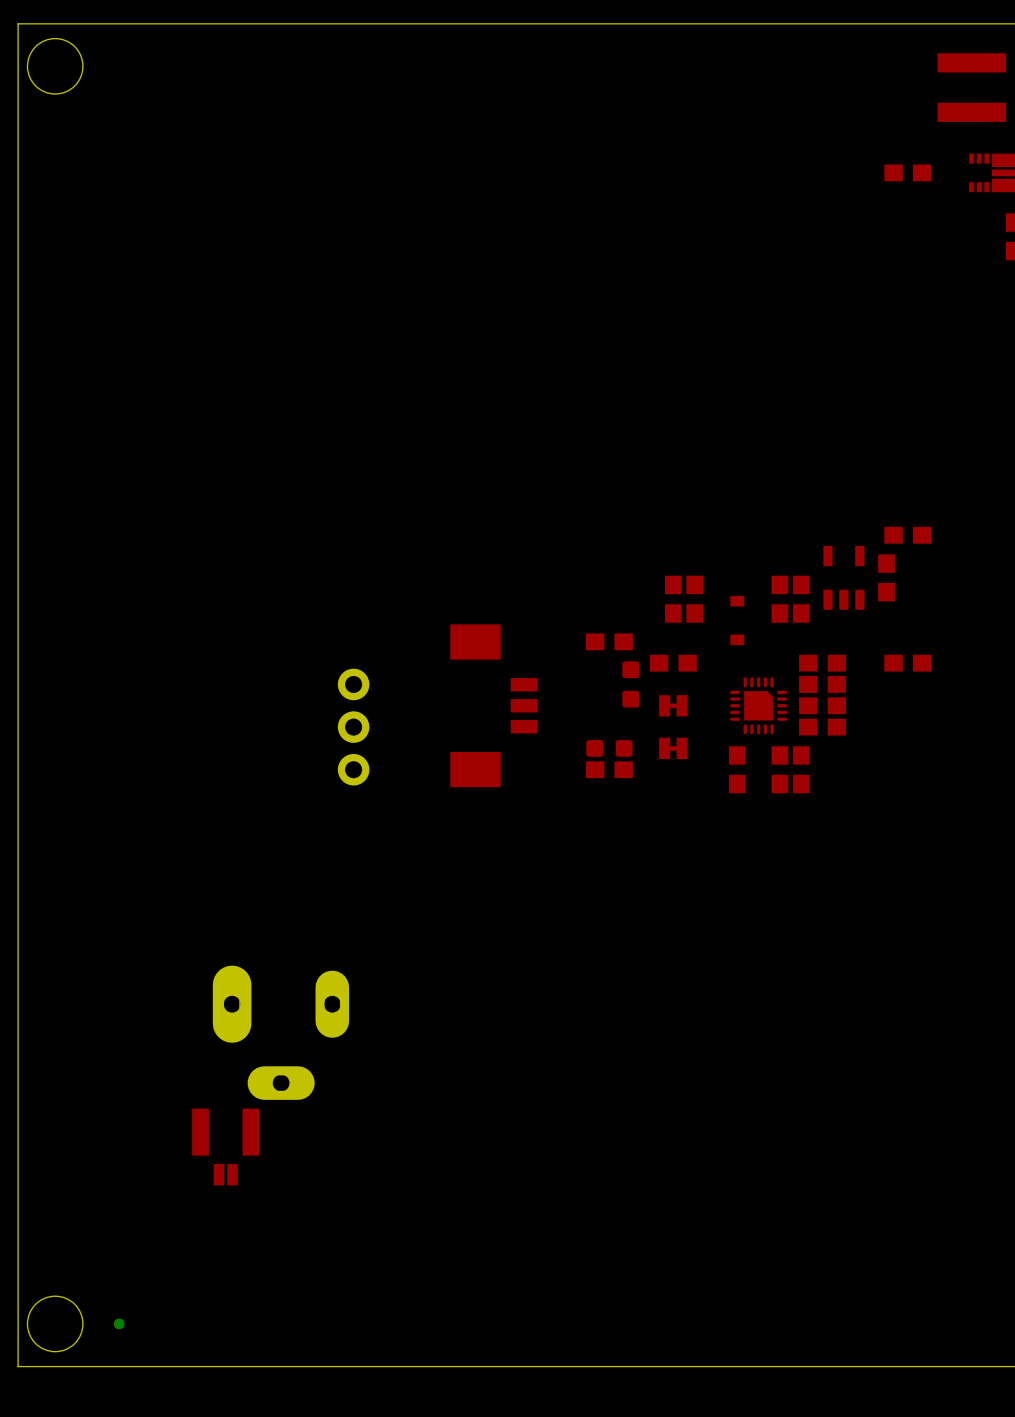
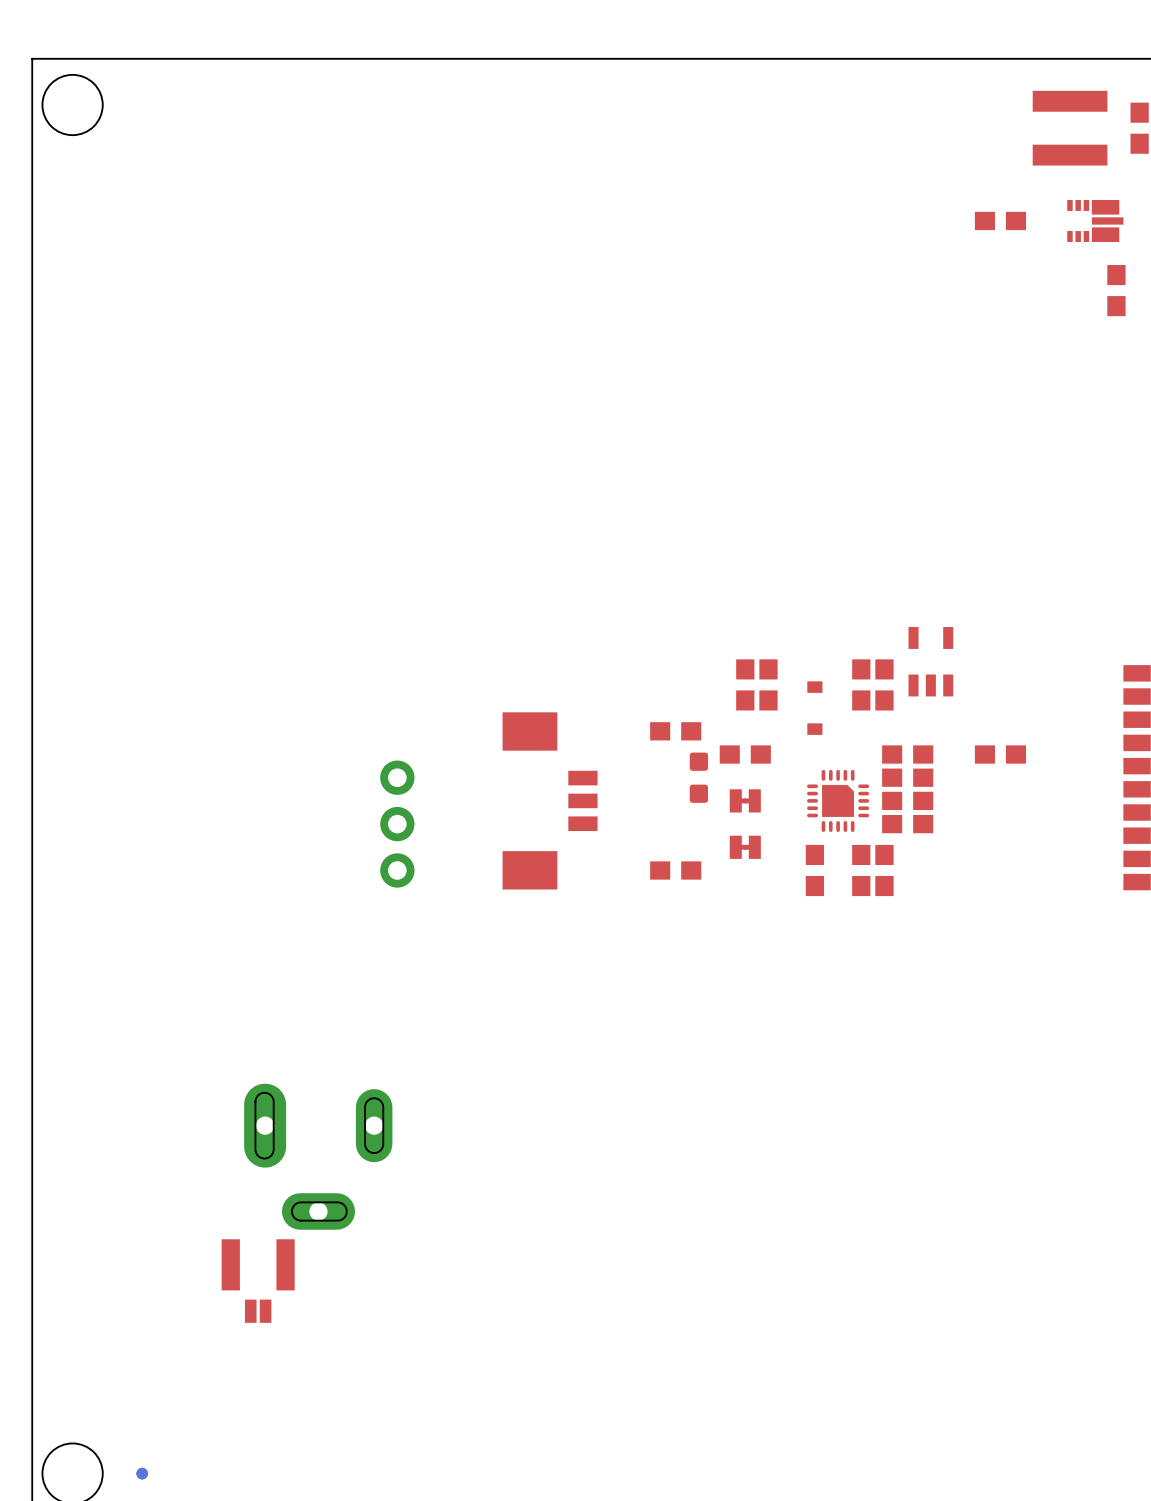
part: (907, 535) -> none
part: (886, 577) -> none
part: (609, 748) -> none

